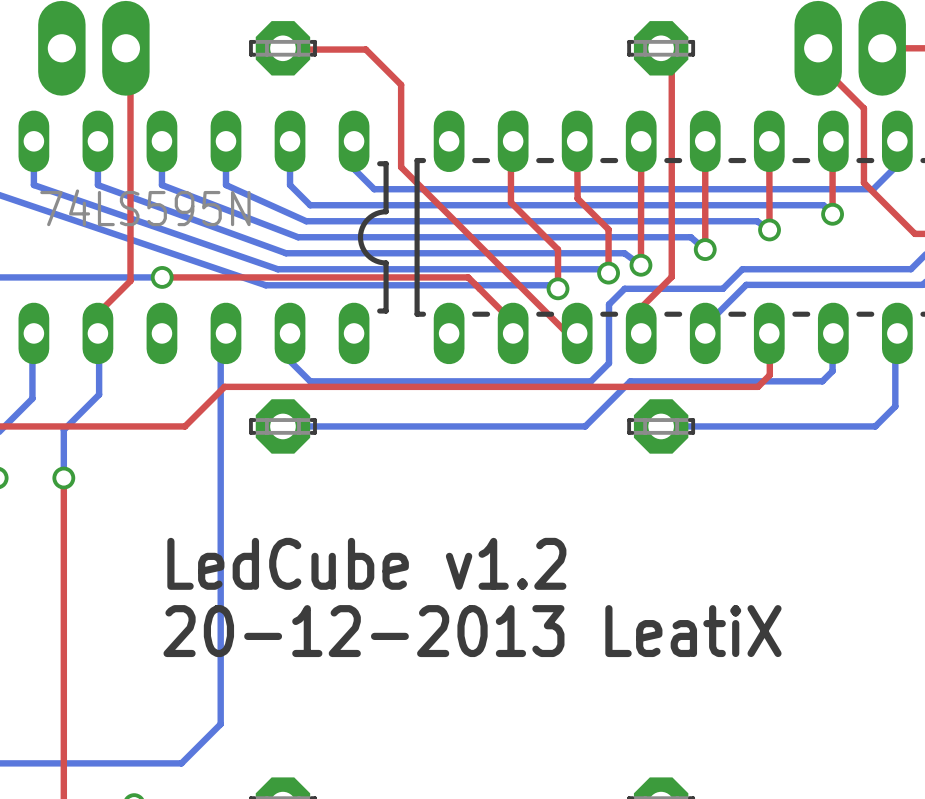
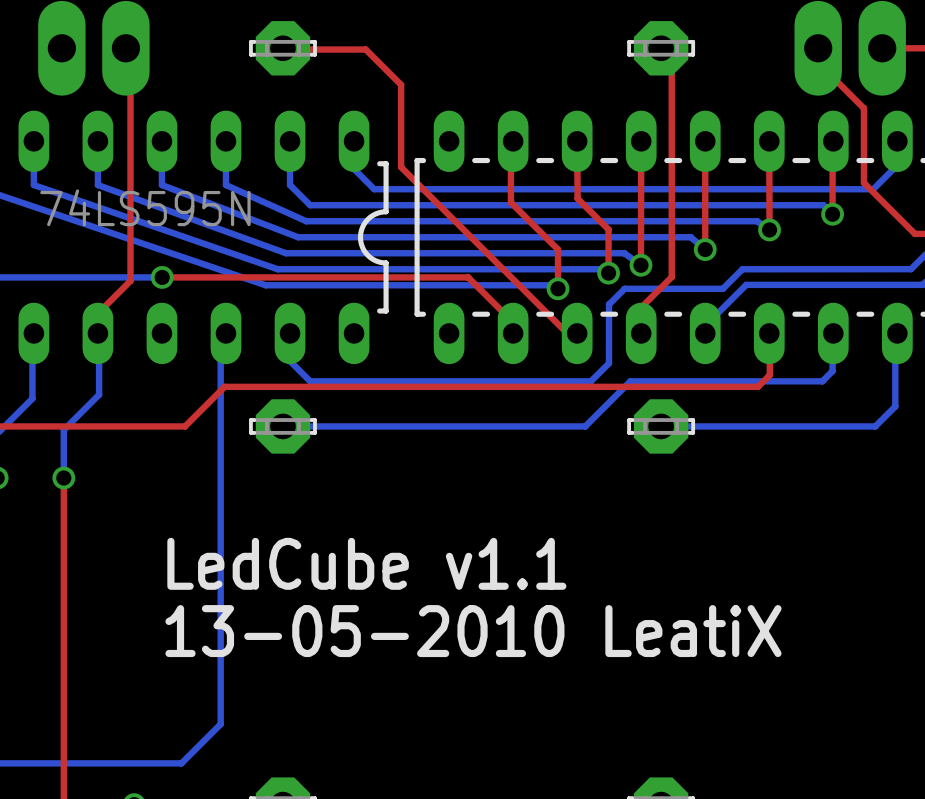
text: LedCube v1.2 (366, 563) -> LedCube v1.1 (366, 563)
text: 20-12-2013 LeatiX (472, 631) -> 13-05-2010 LeatiX (473, 631)

